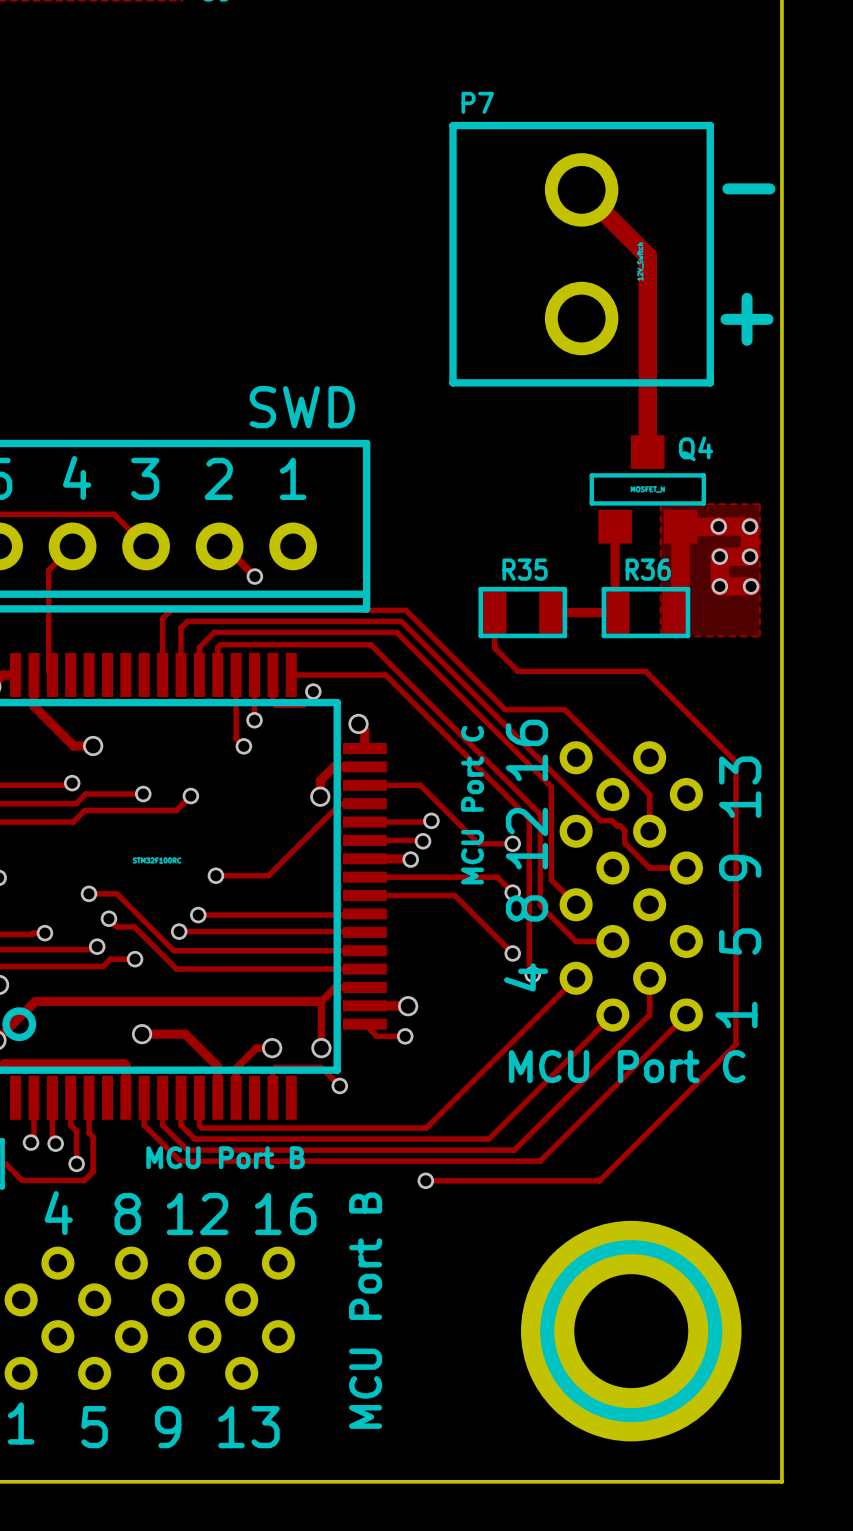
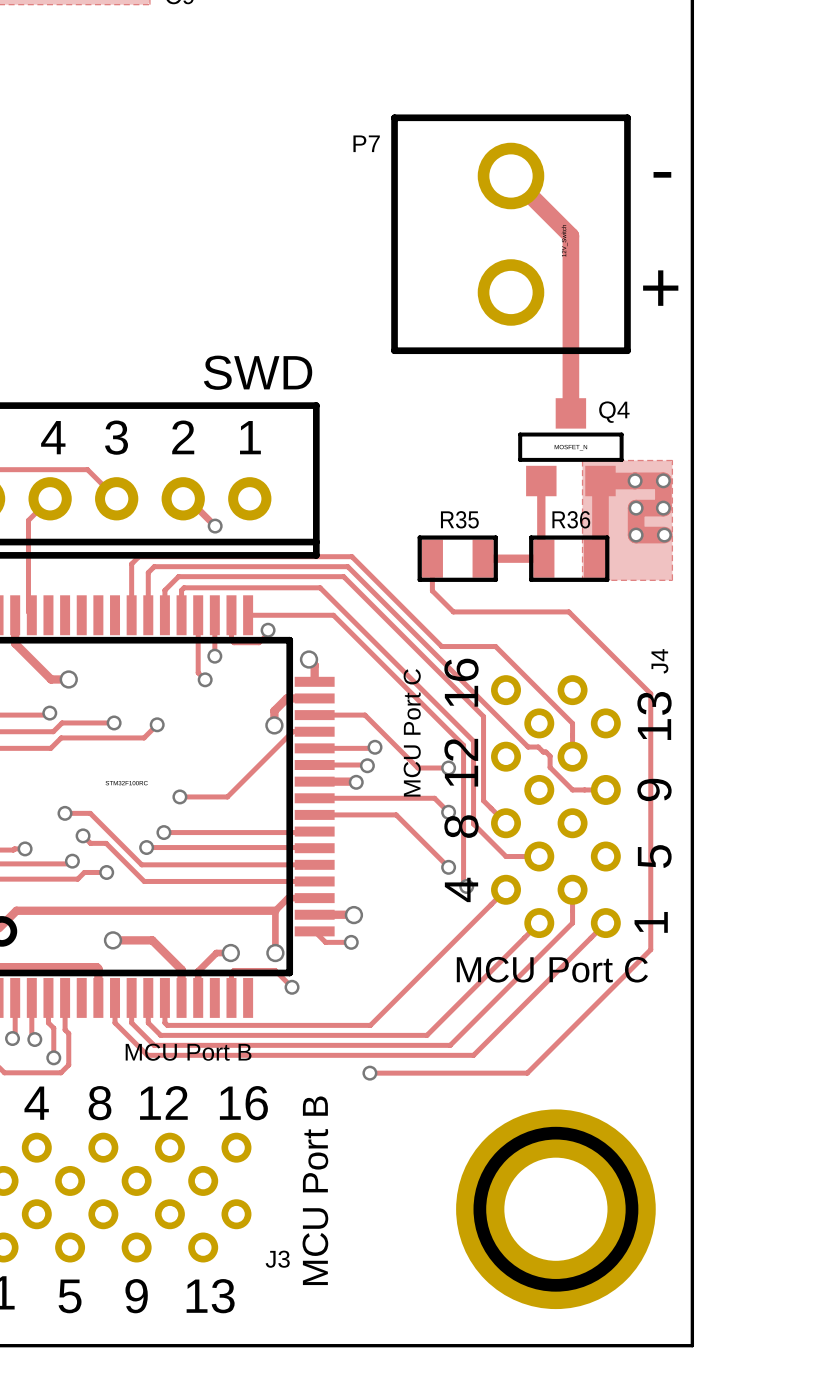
P7 name position: P7 (477, 102) -> P7 (366, 143)
J4 name: none -> J4 (659, 661)
J3 name: none -> J3 (277, 1259)

